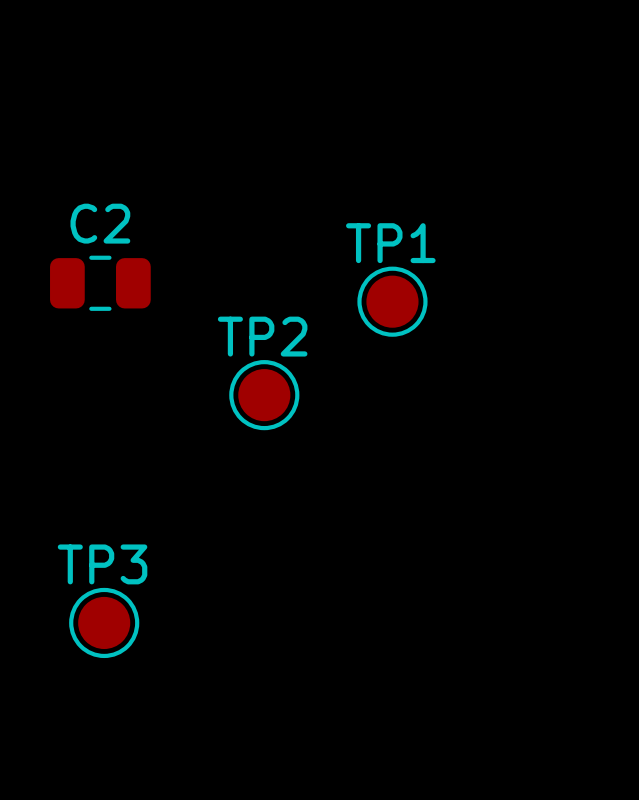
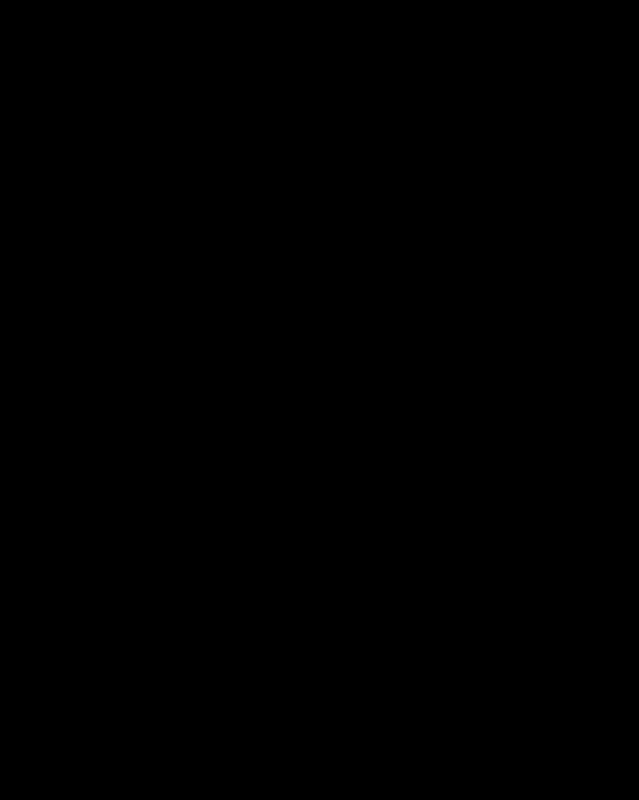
C2: (100, 283) -> none
TP1: (392, 301) -> none
TP2: (264, 395) -> none
TP3: (104, 622) -> none

